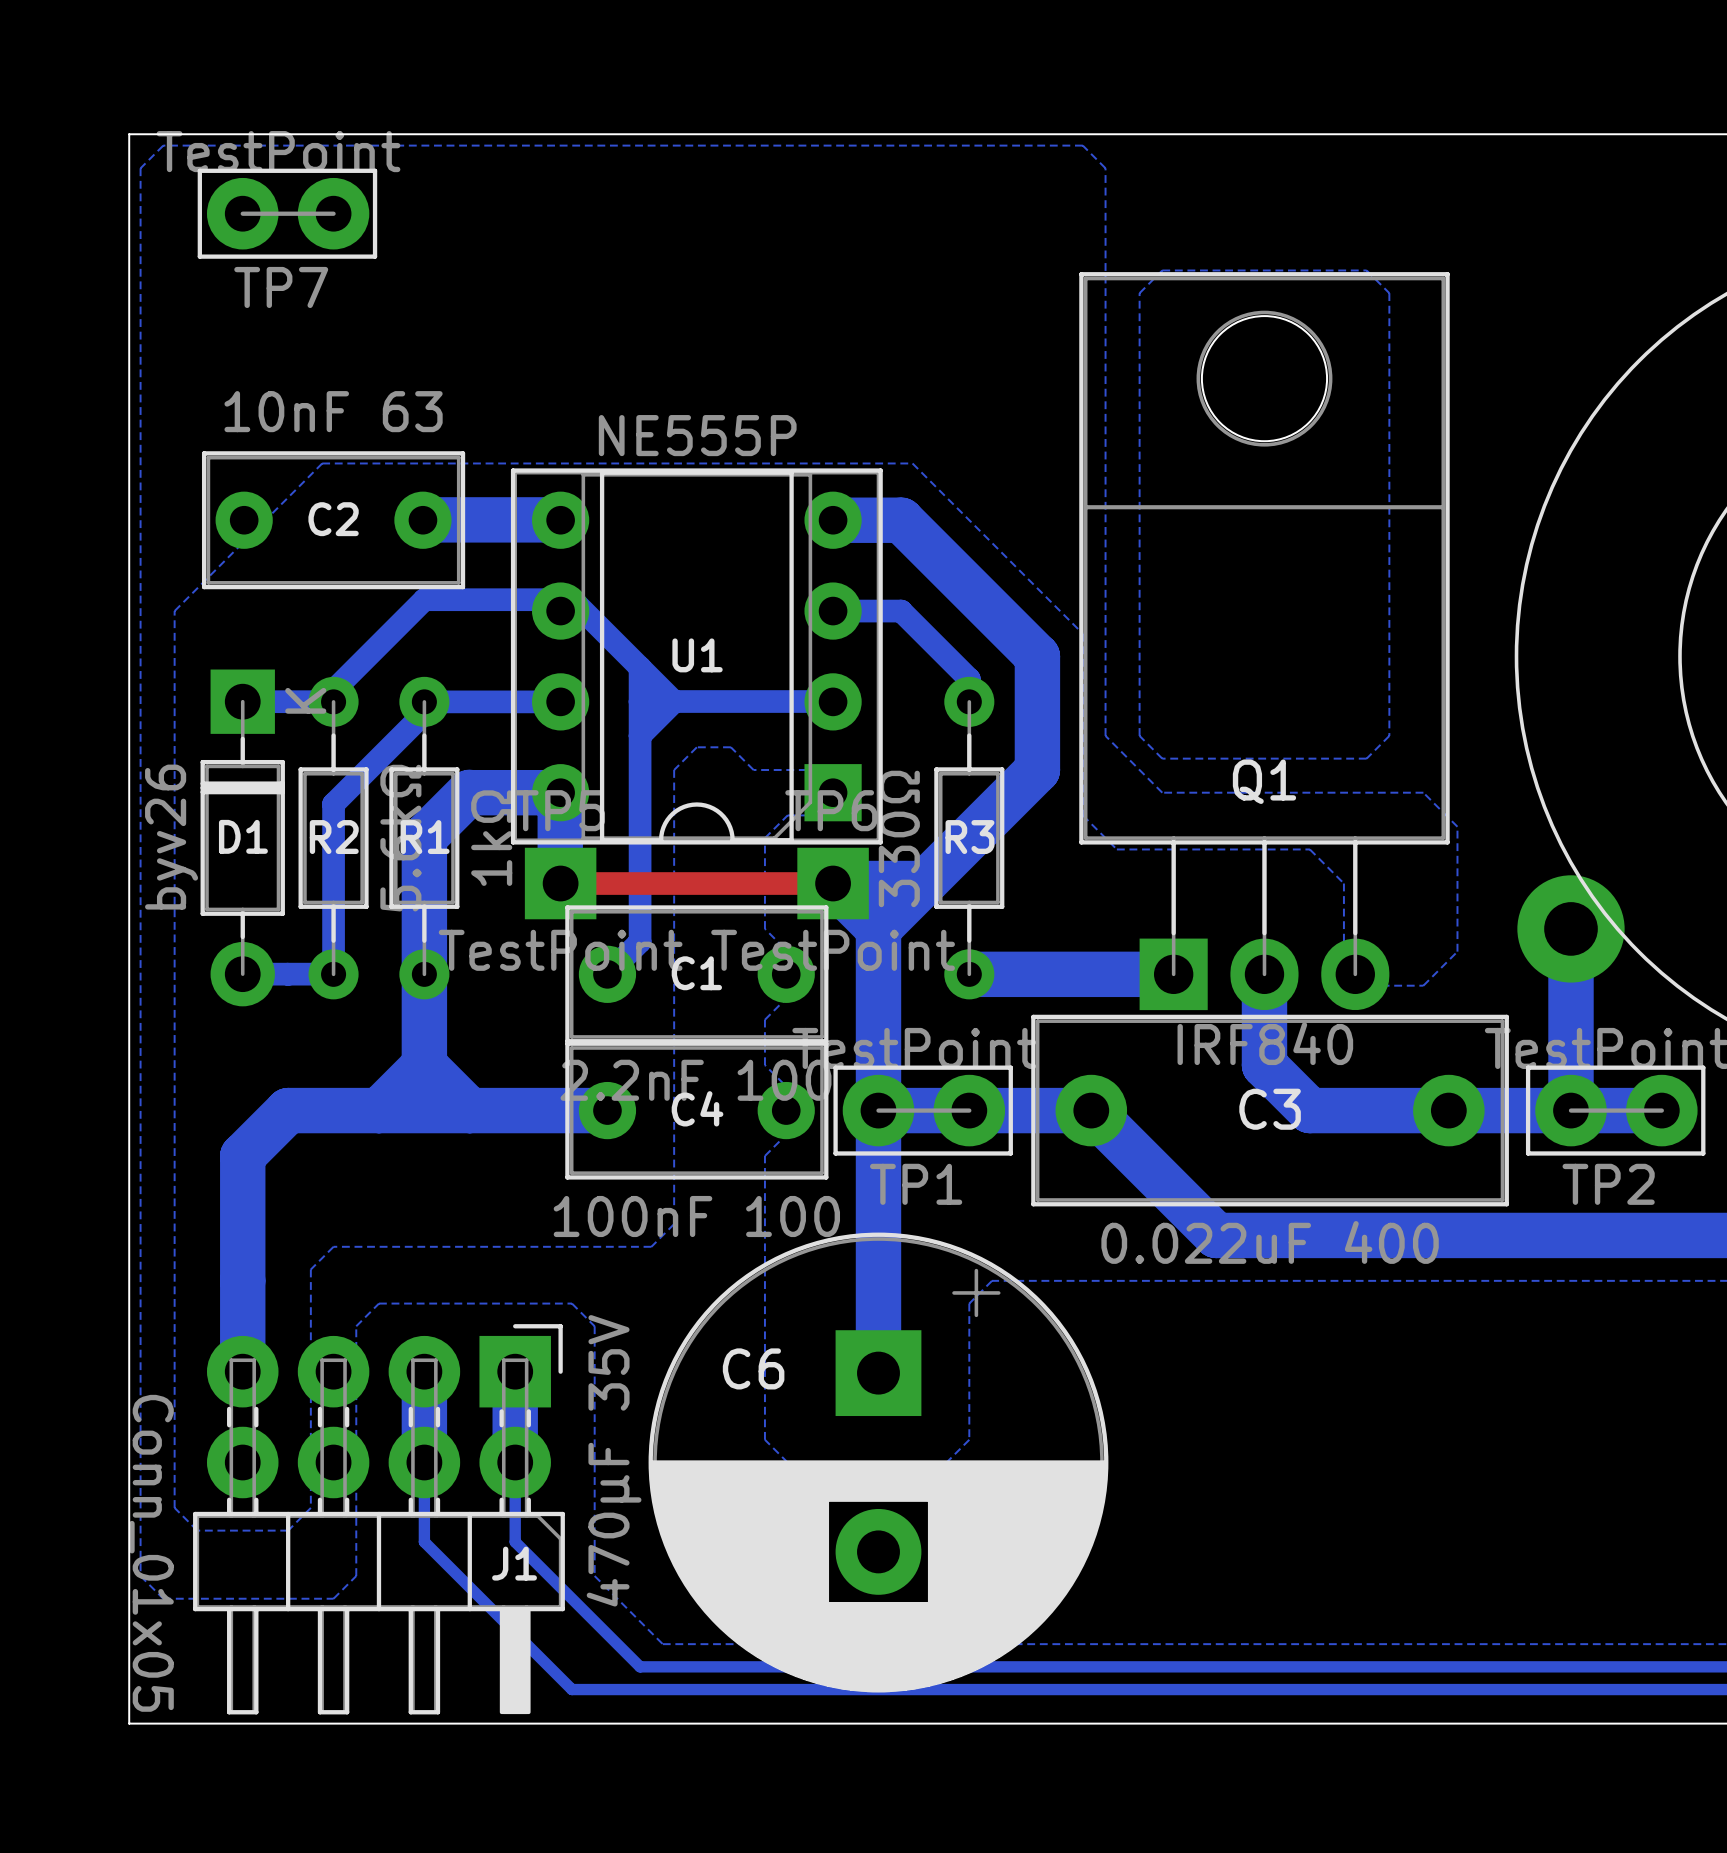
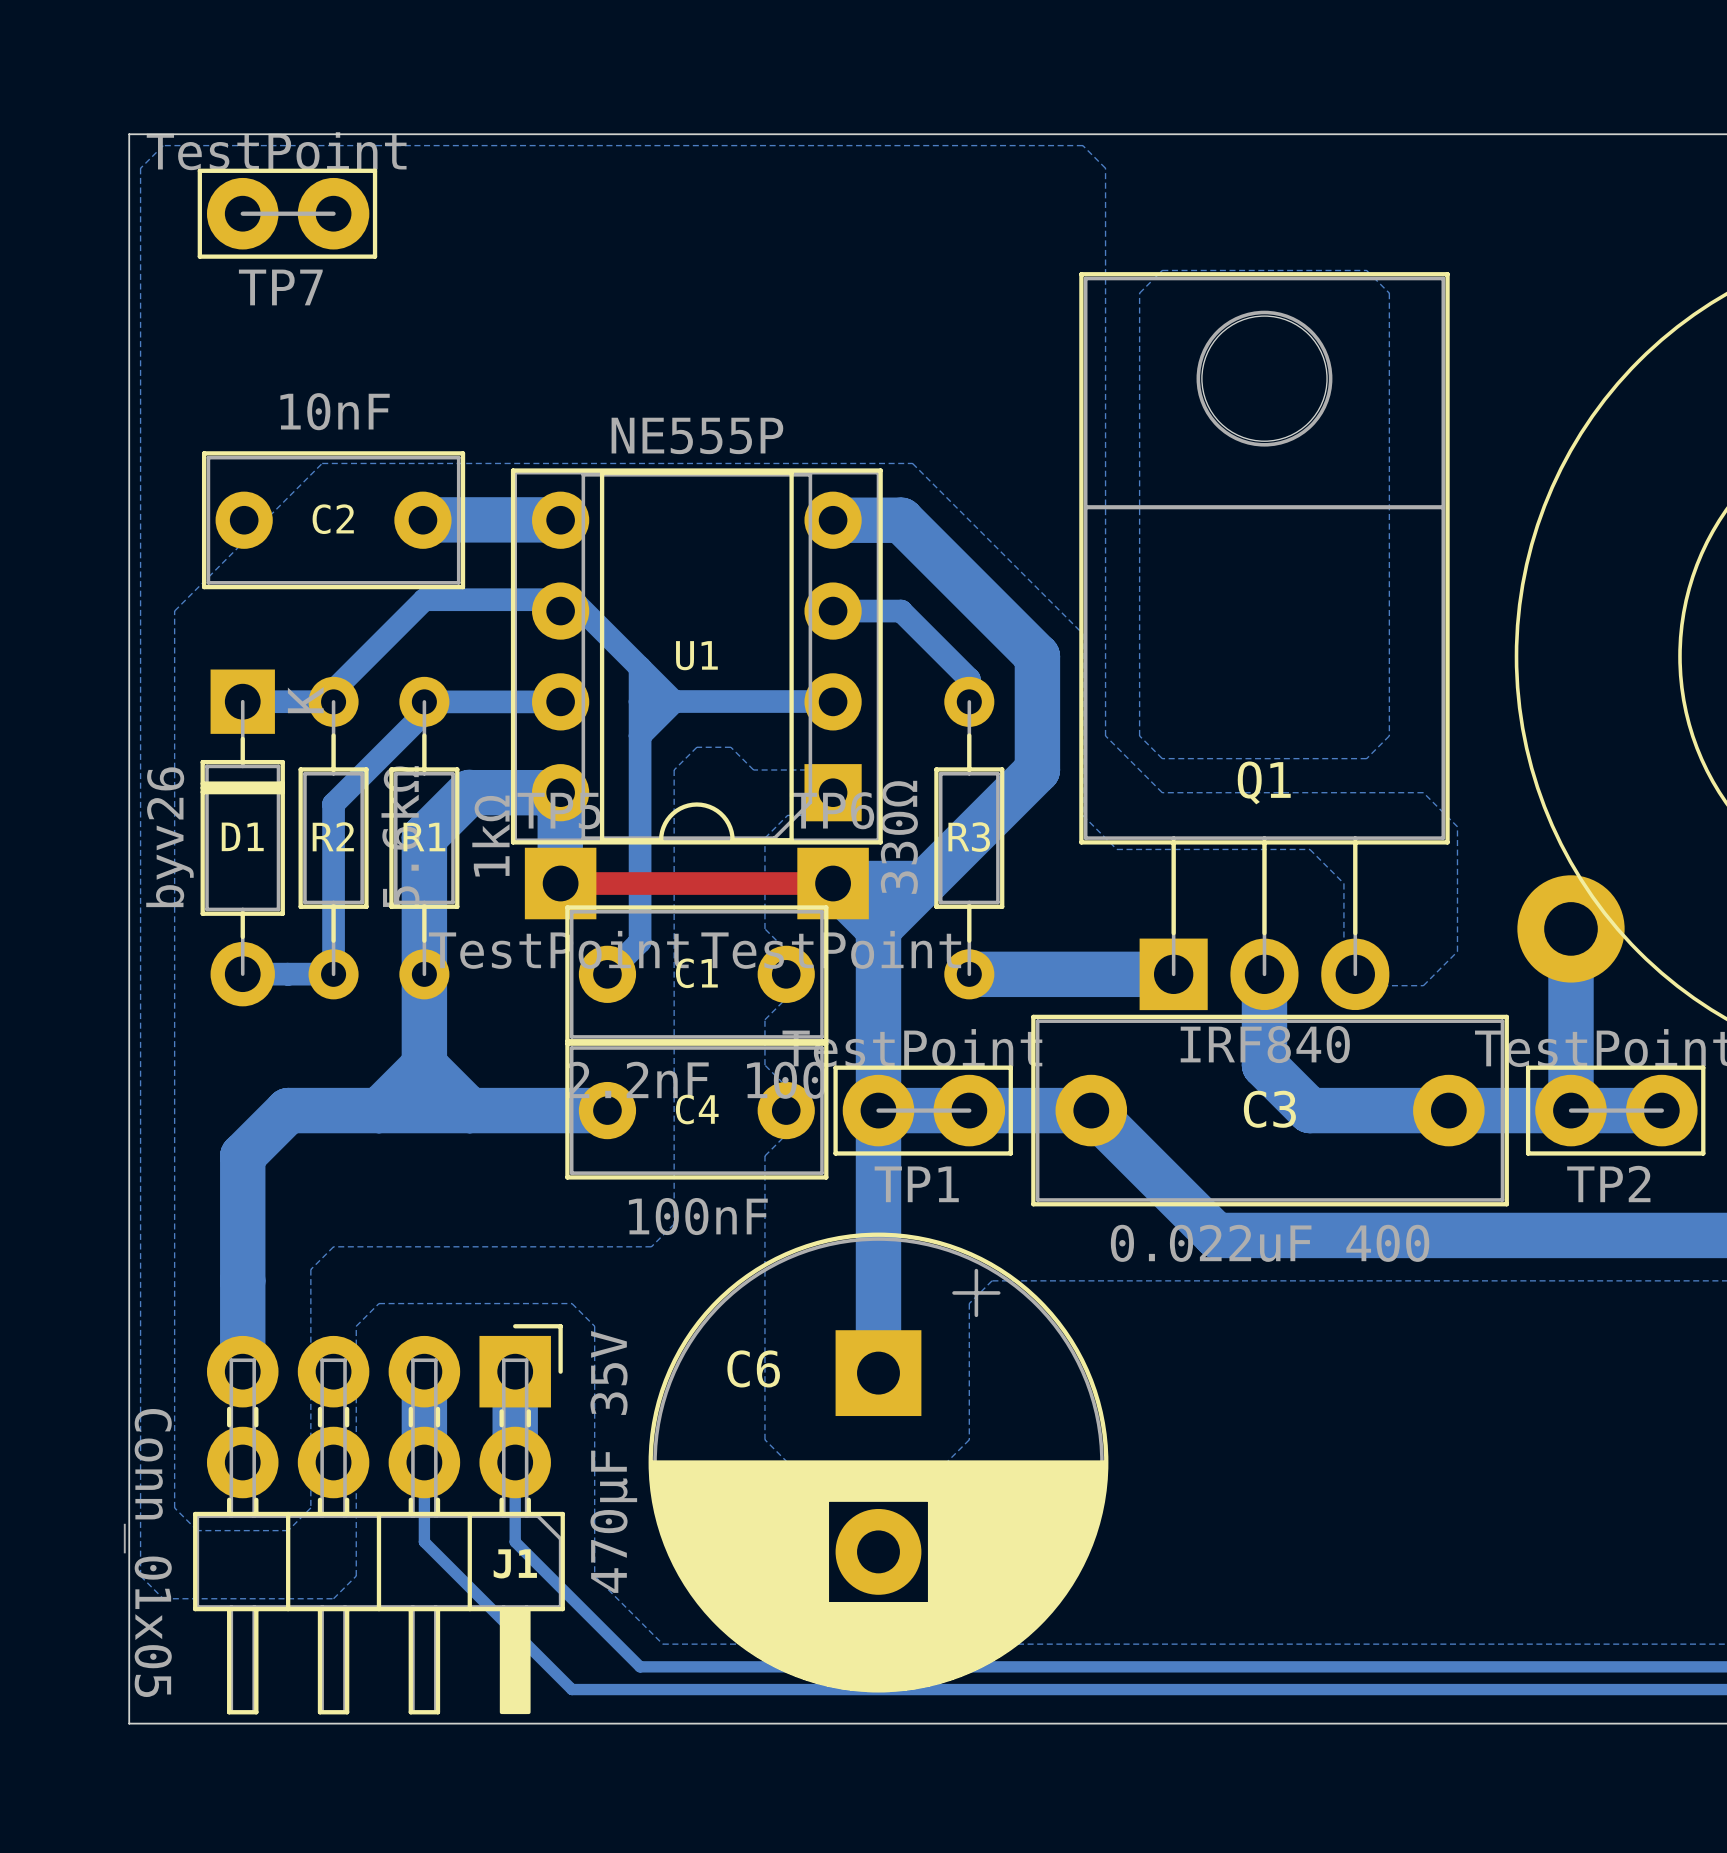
C2 value: 10nF 63 (333, 411) -> 10nF (335, 411)
C4 value: 100nF 100 (696, 1216) -> 100nF (698, 1216)

